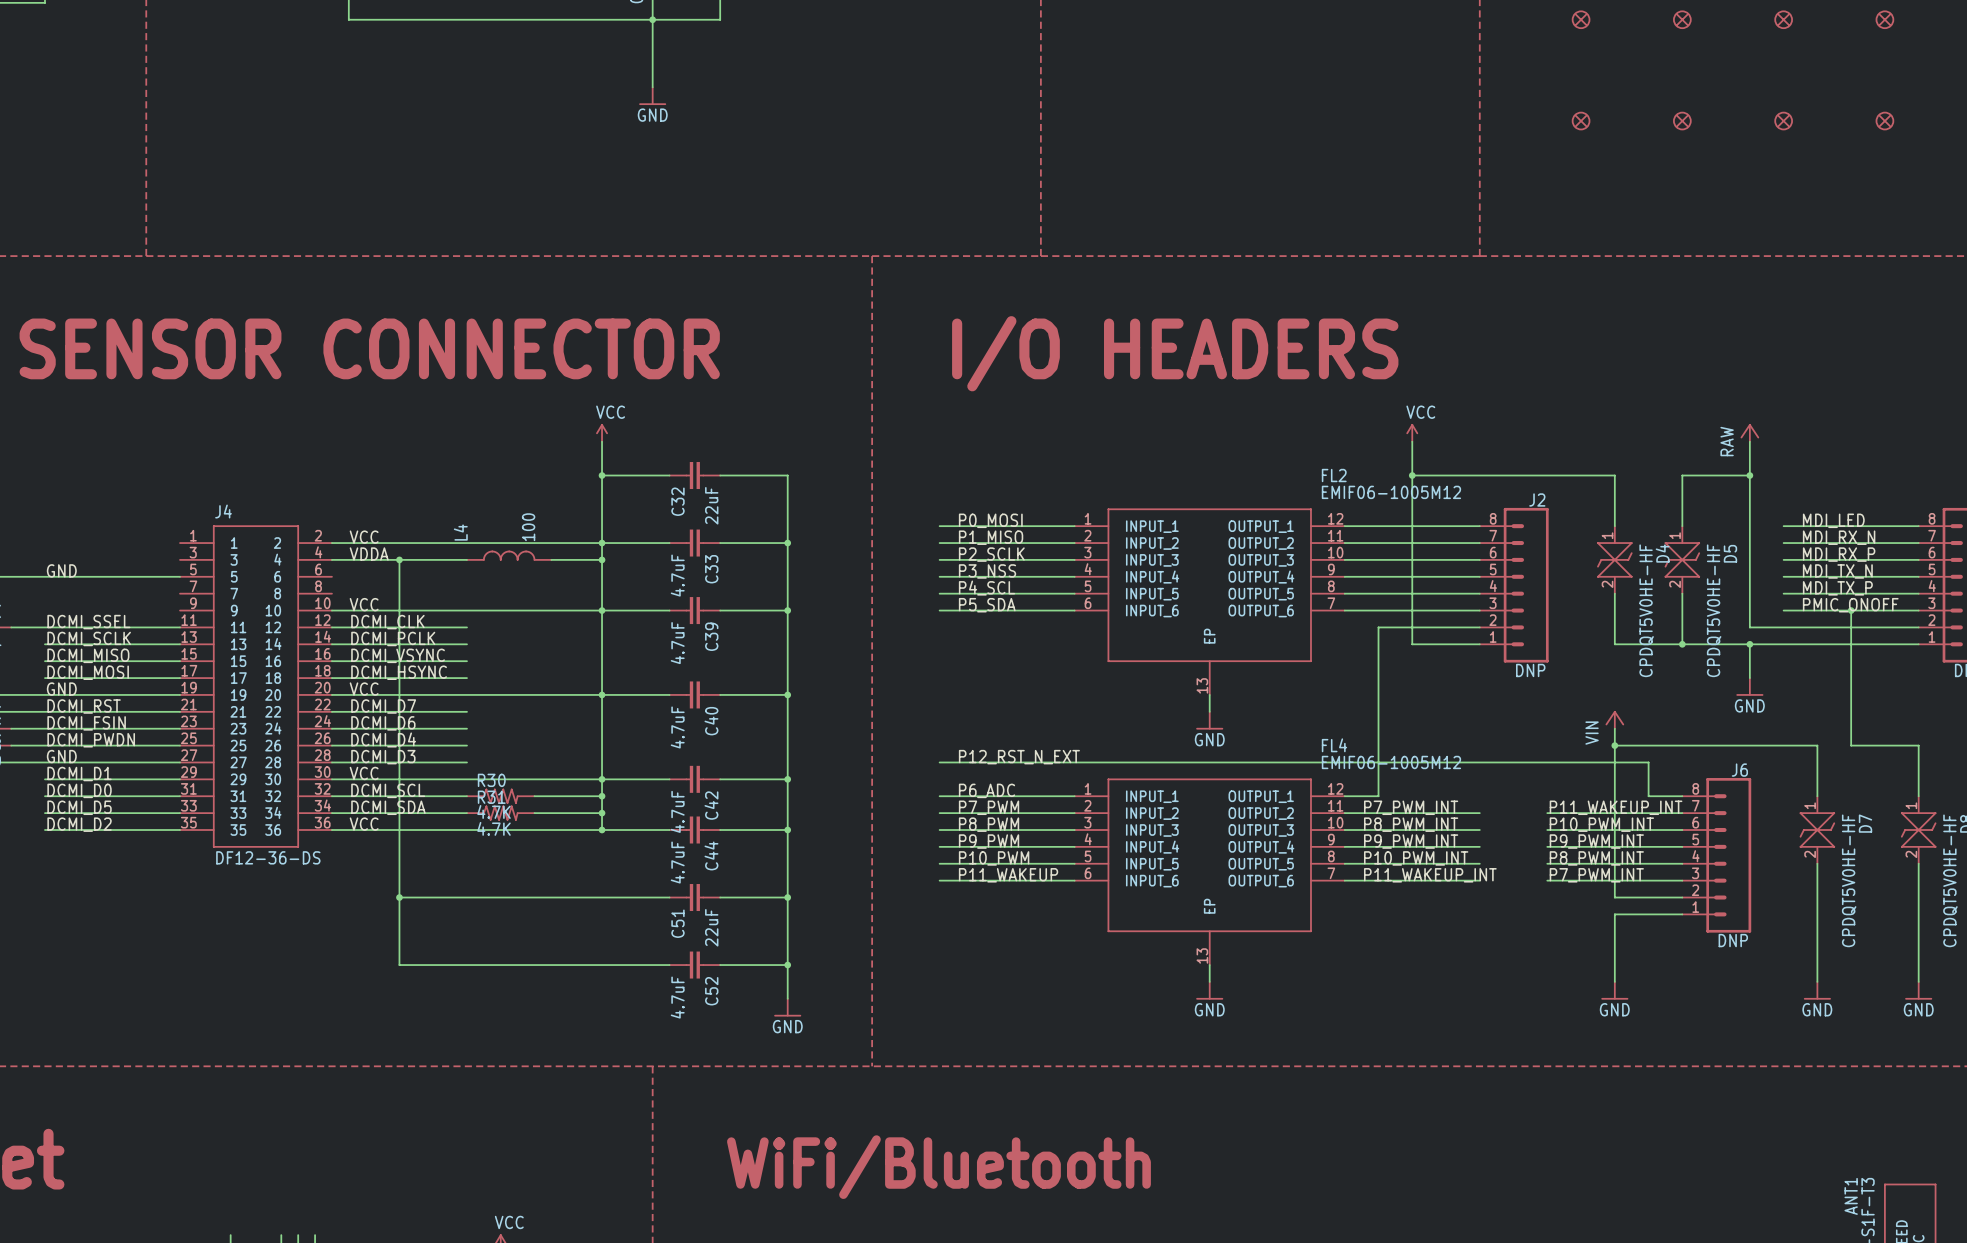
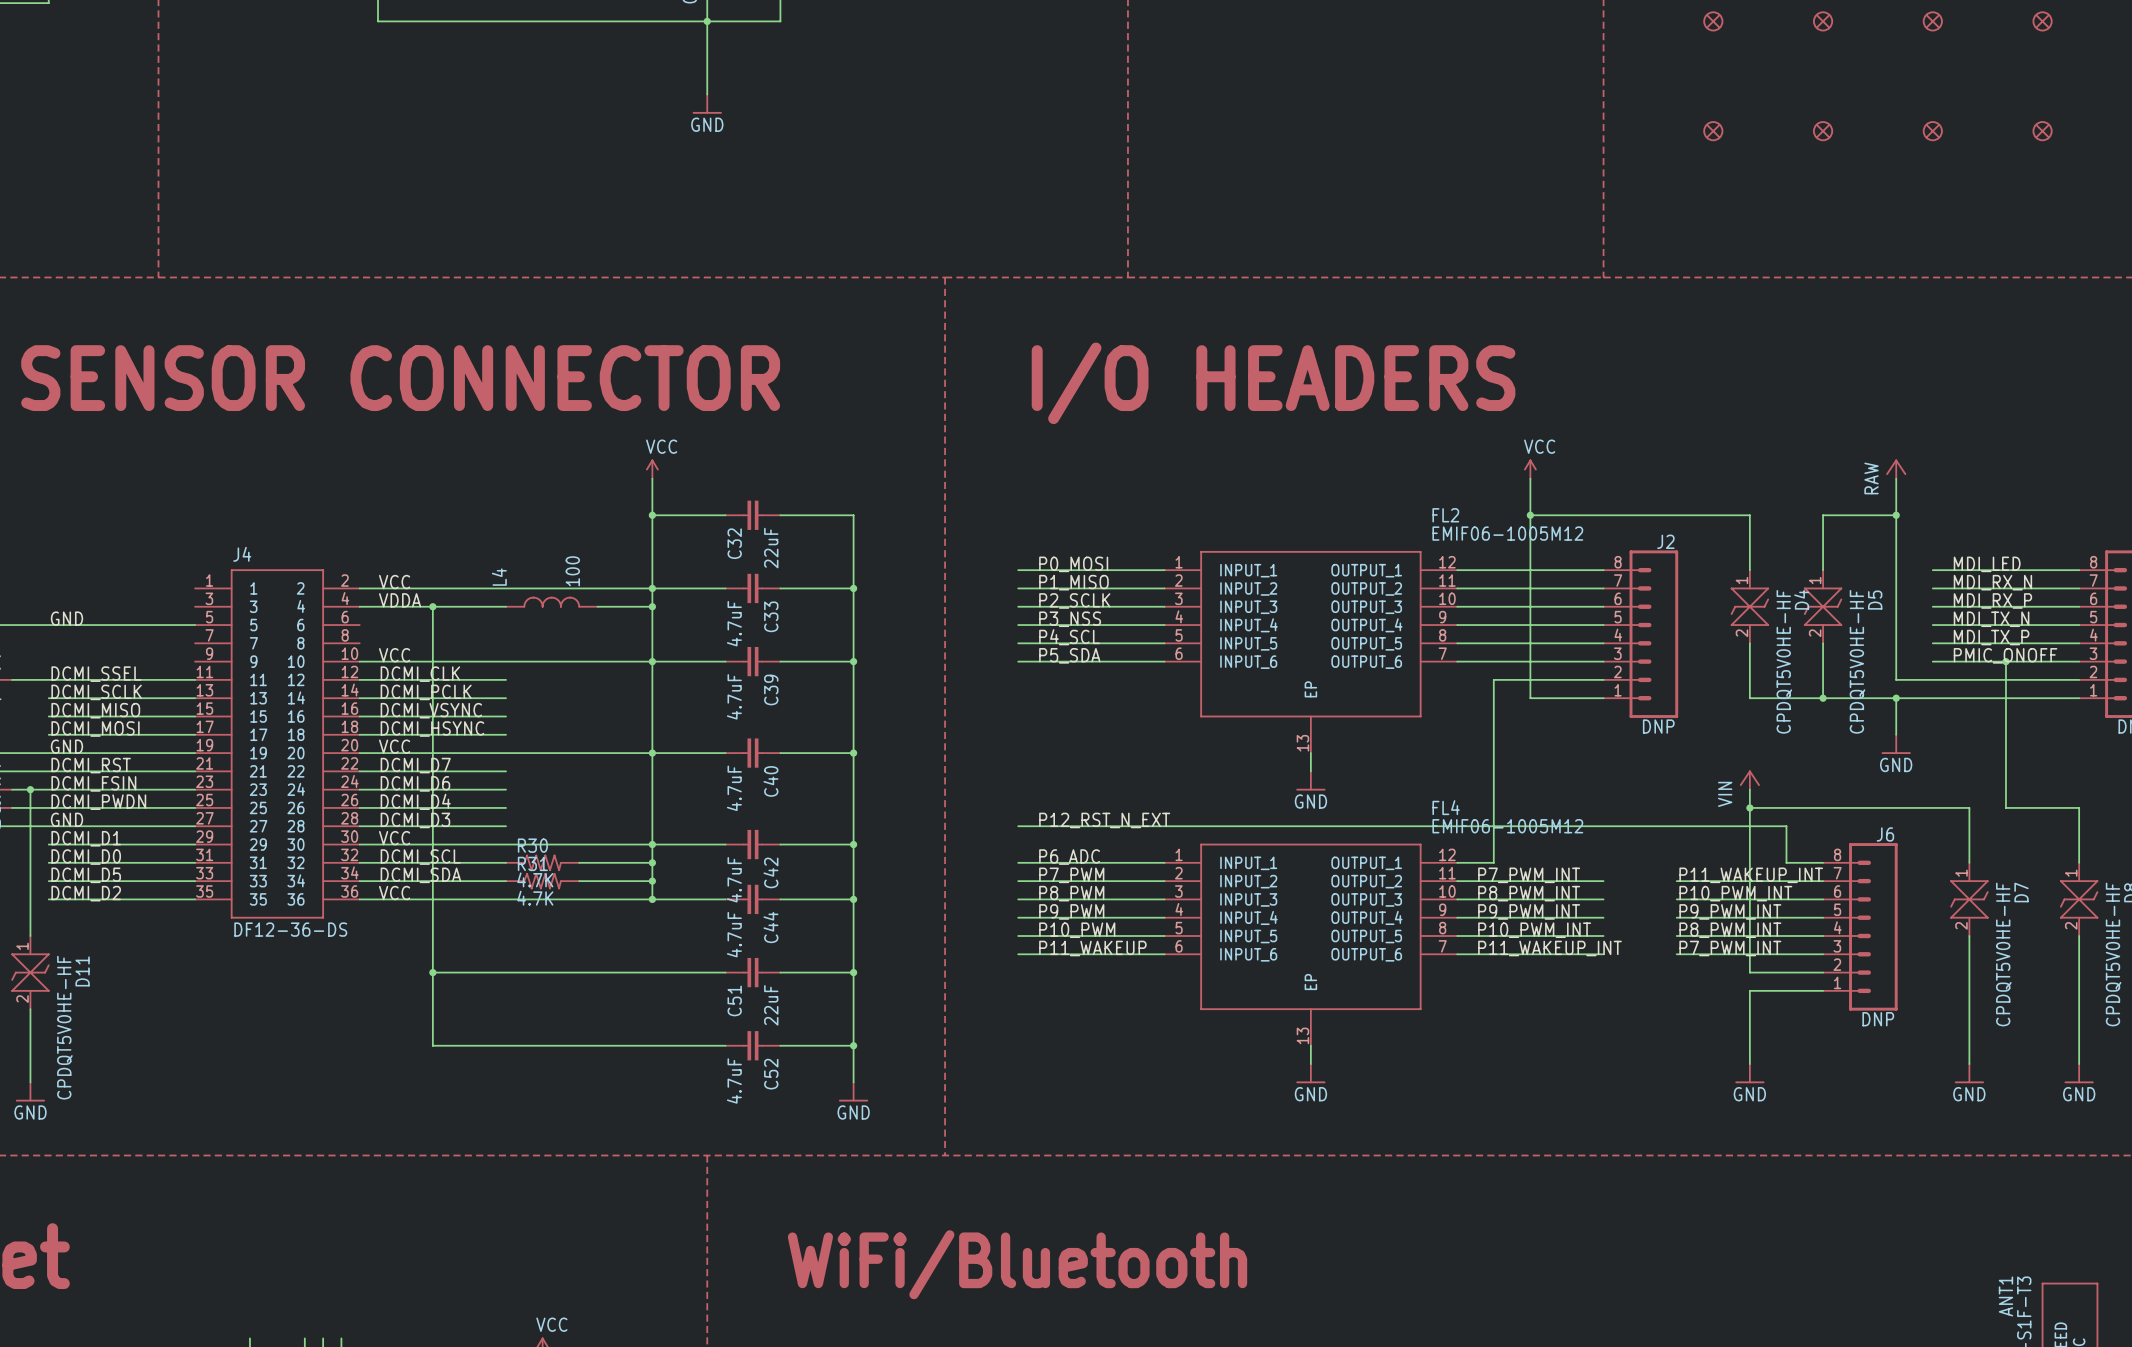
wire: none -> (30, 789) (30, 936)
junction: none -> (30, 789)
D11: none -> CPDQT5V0HE-HF (30, 972)
wire: none -> (30, 1009) (30, 1082)
power symbol: none -> GND (30, 1091)

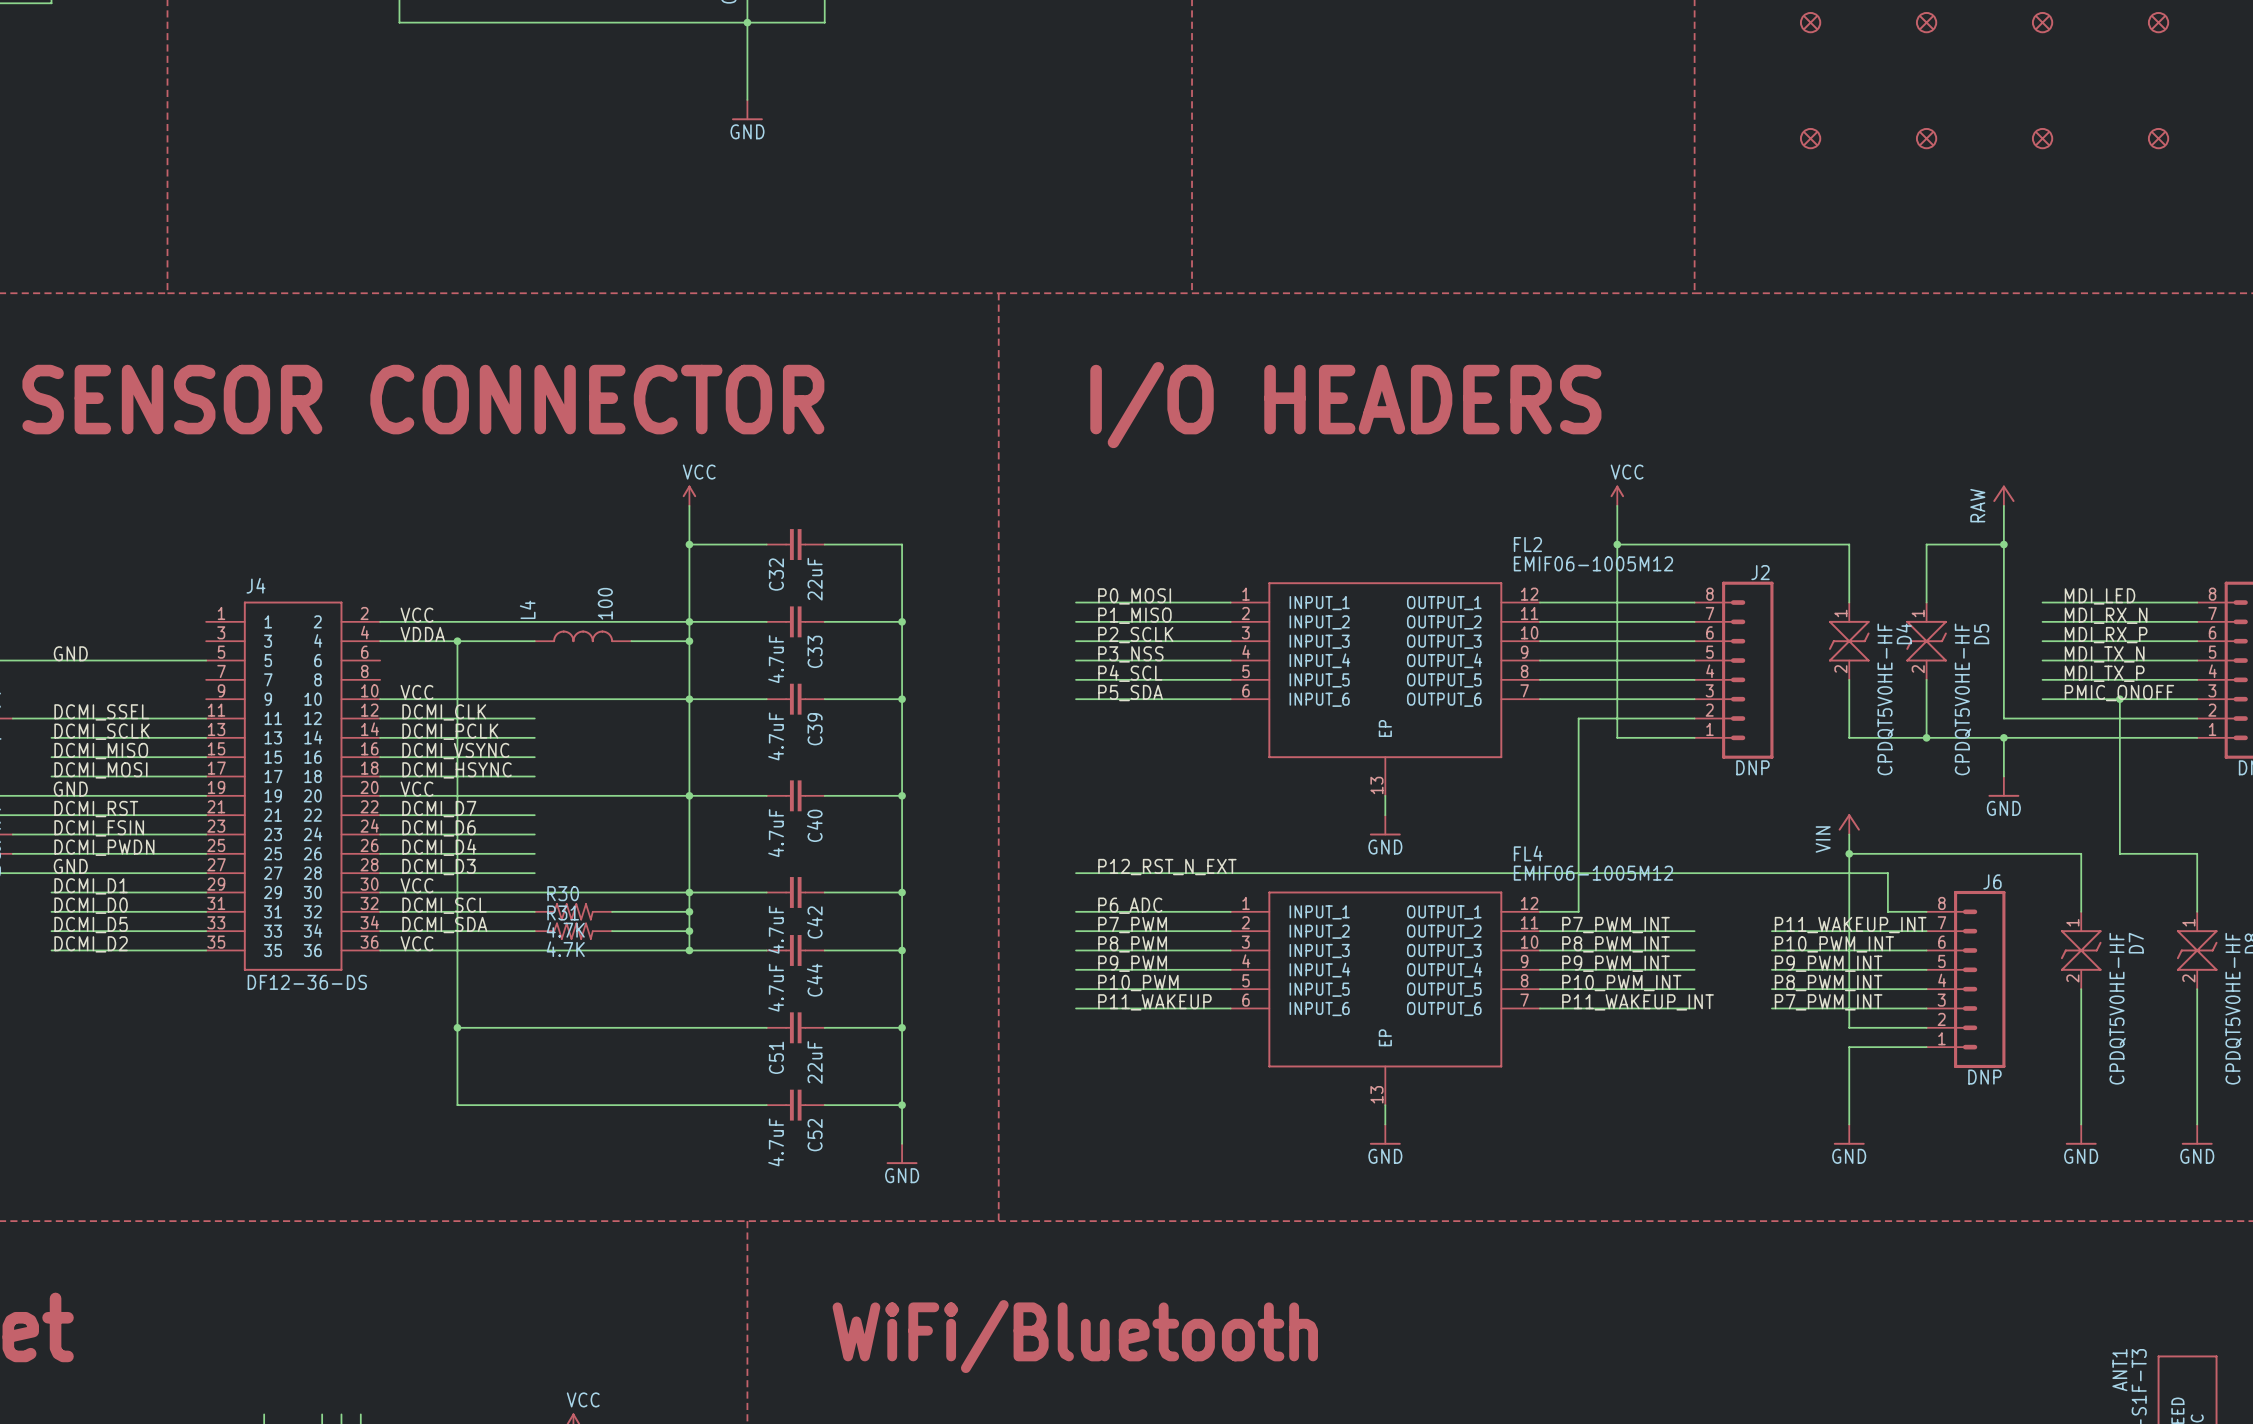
wire: (30, 789) (30, 936) -> none
junction: (30, 789) -> none
D11: CPDQT5V0HE-HF (30, 972) -> none
wire: (30, 1009) (30, 1082) -> none
power symbol: GND (30, 1091) -> none

